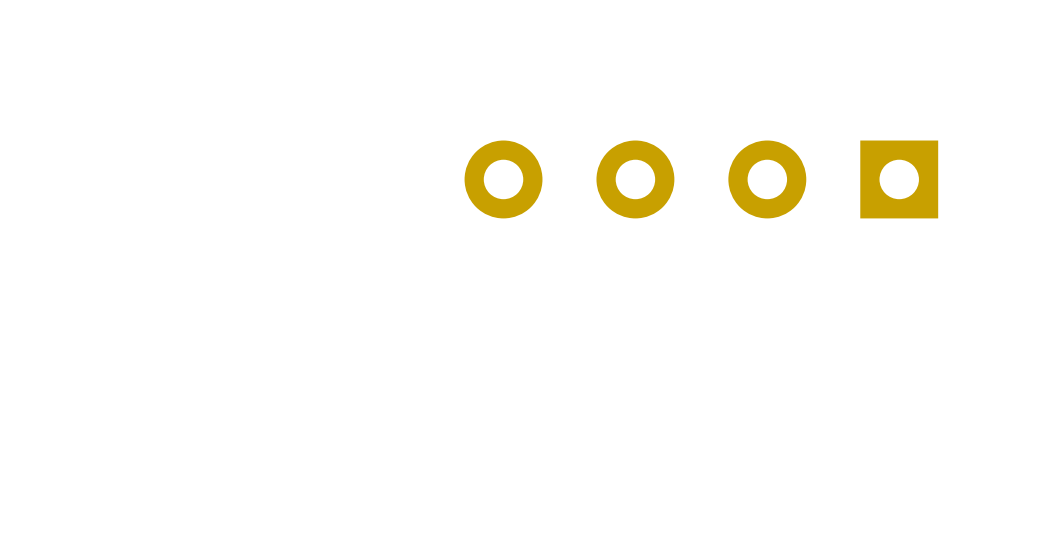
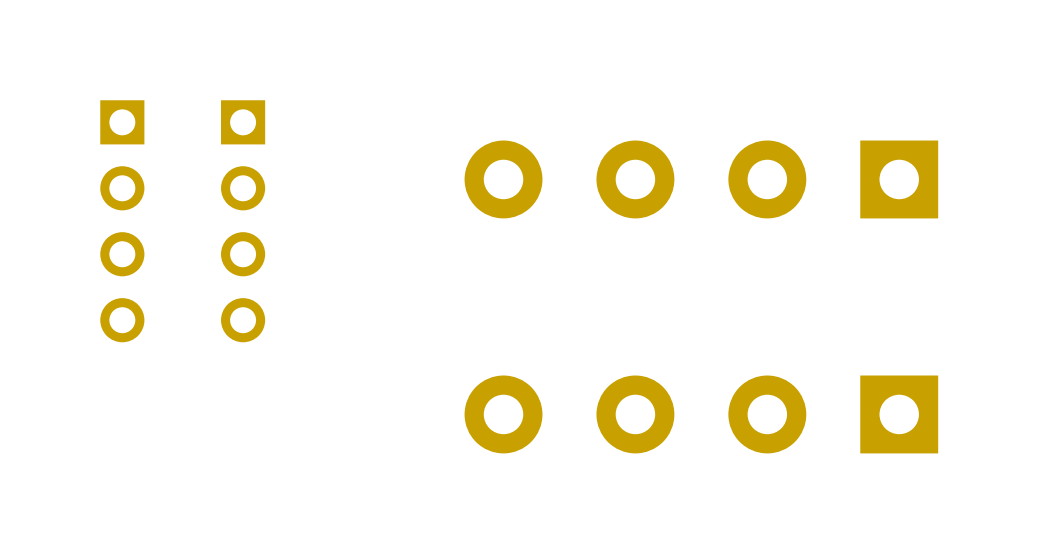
part: none -> (122, 221)
part: none -> (243, 221)
part: none -> (701, 414)

